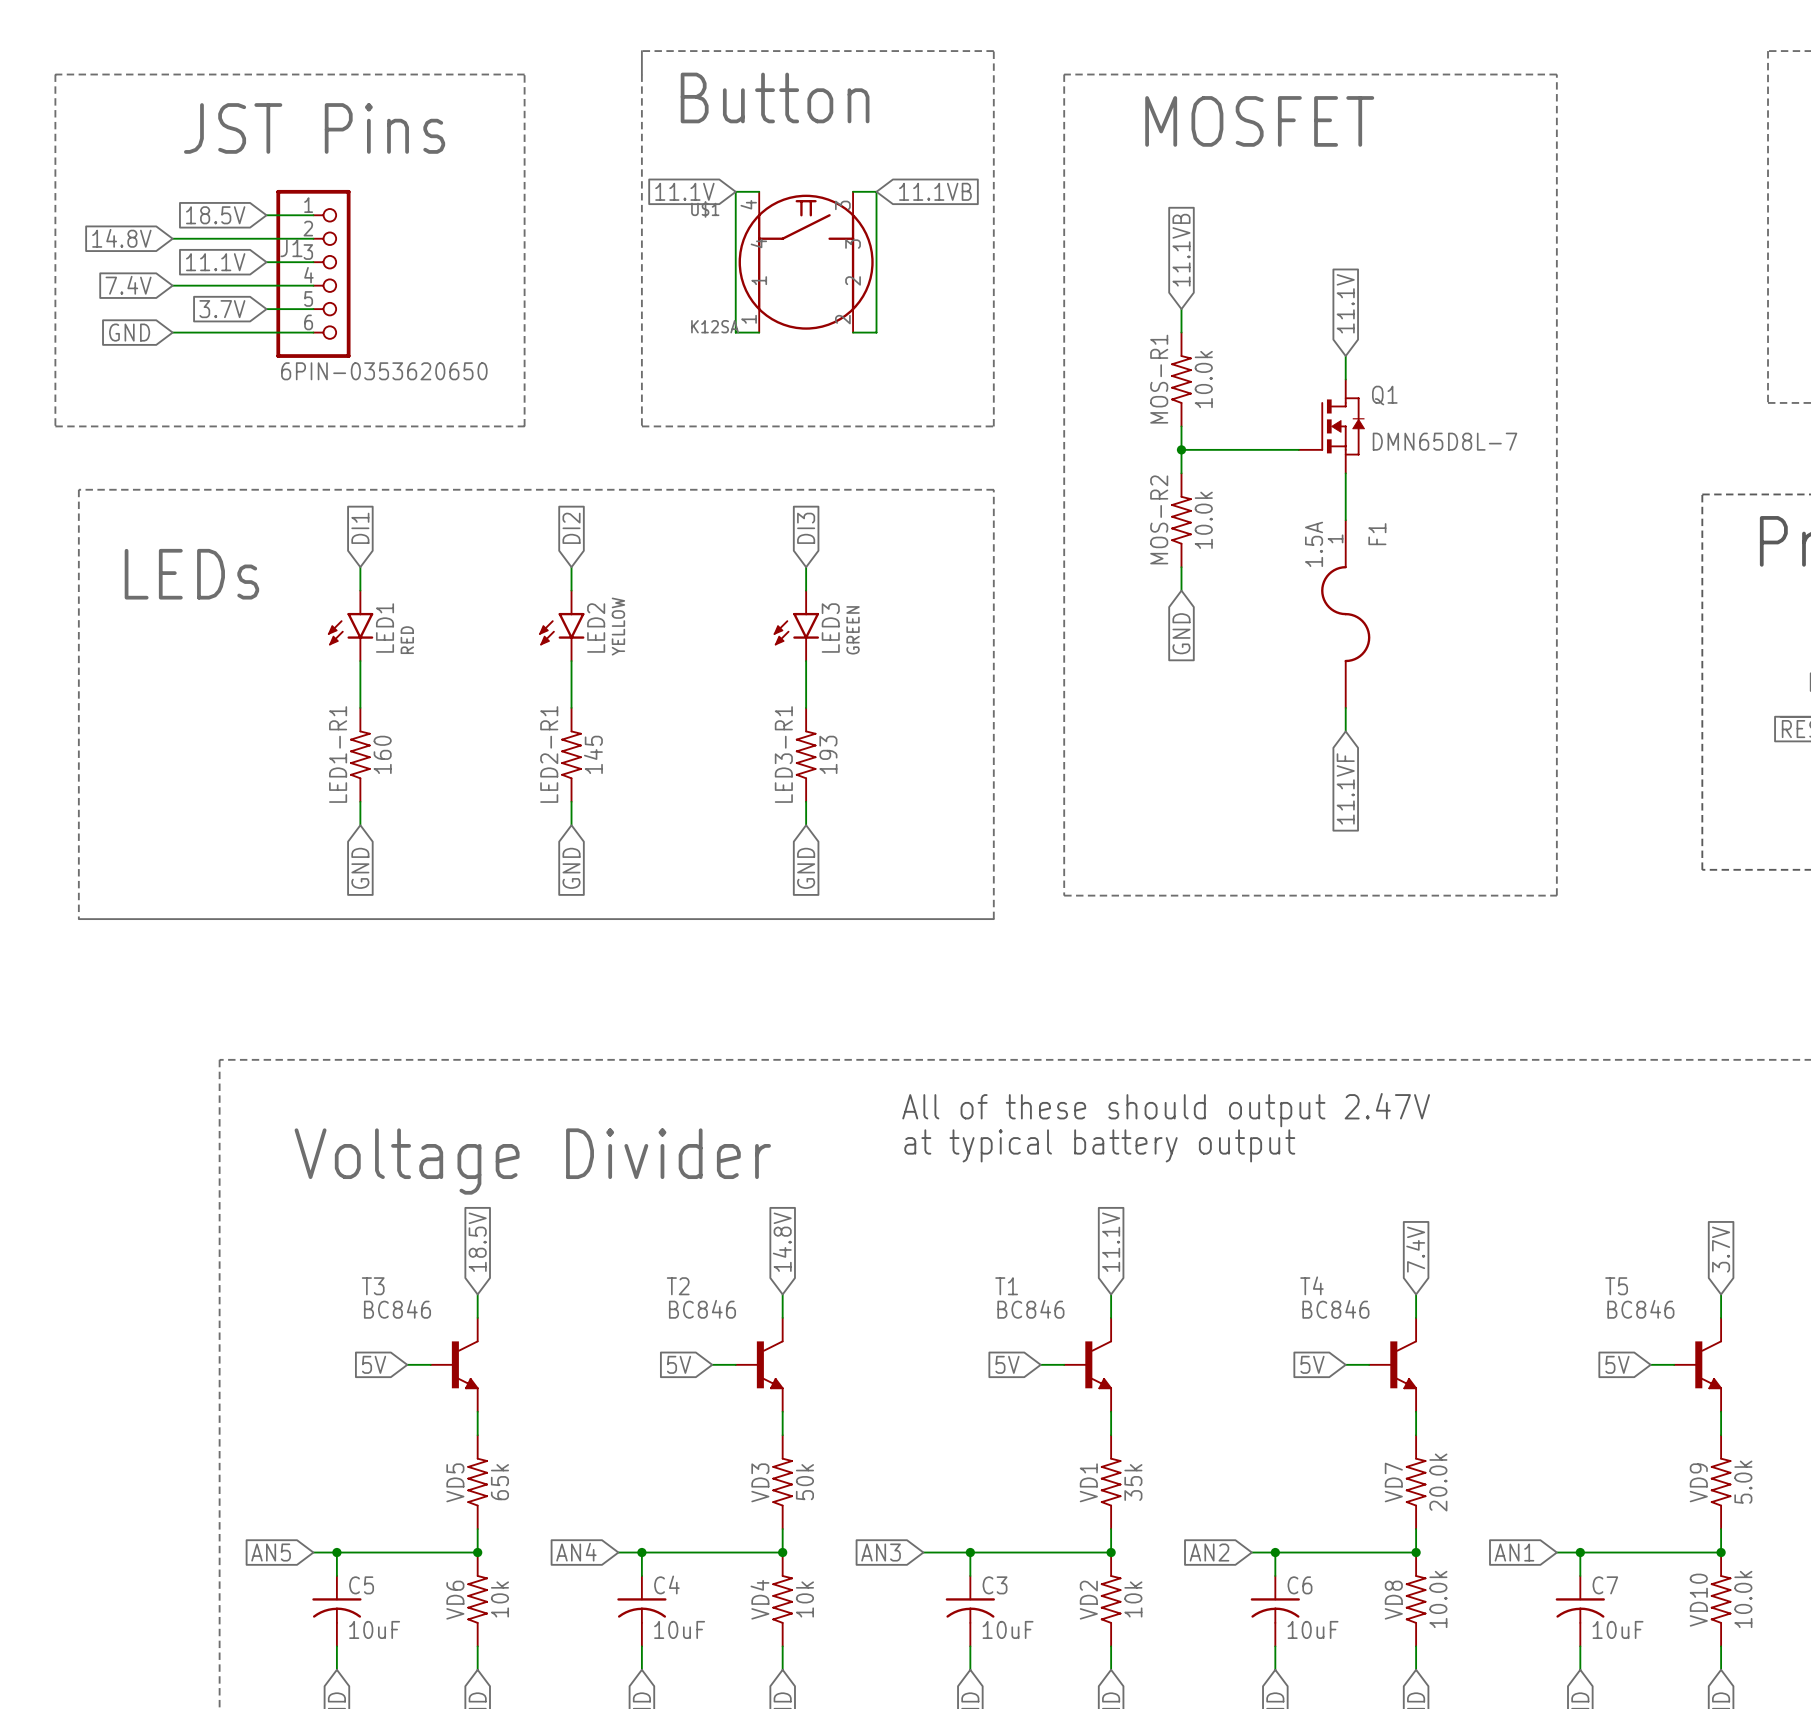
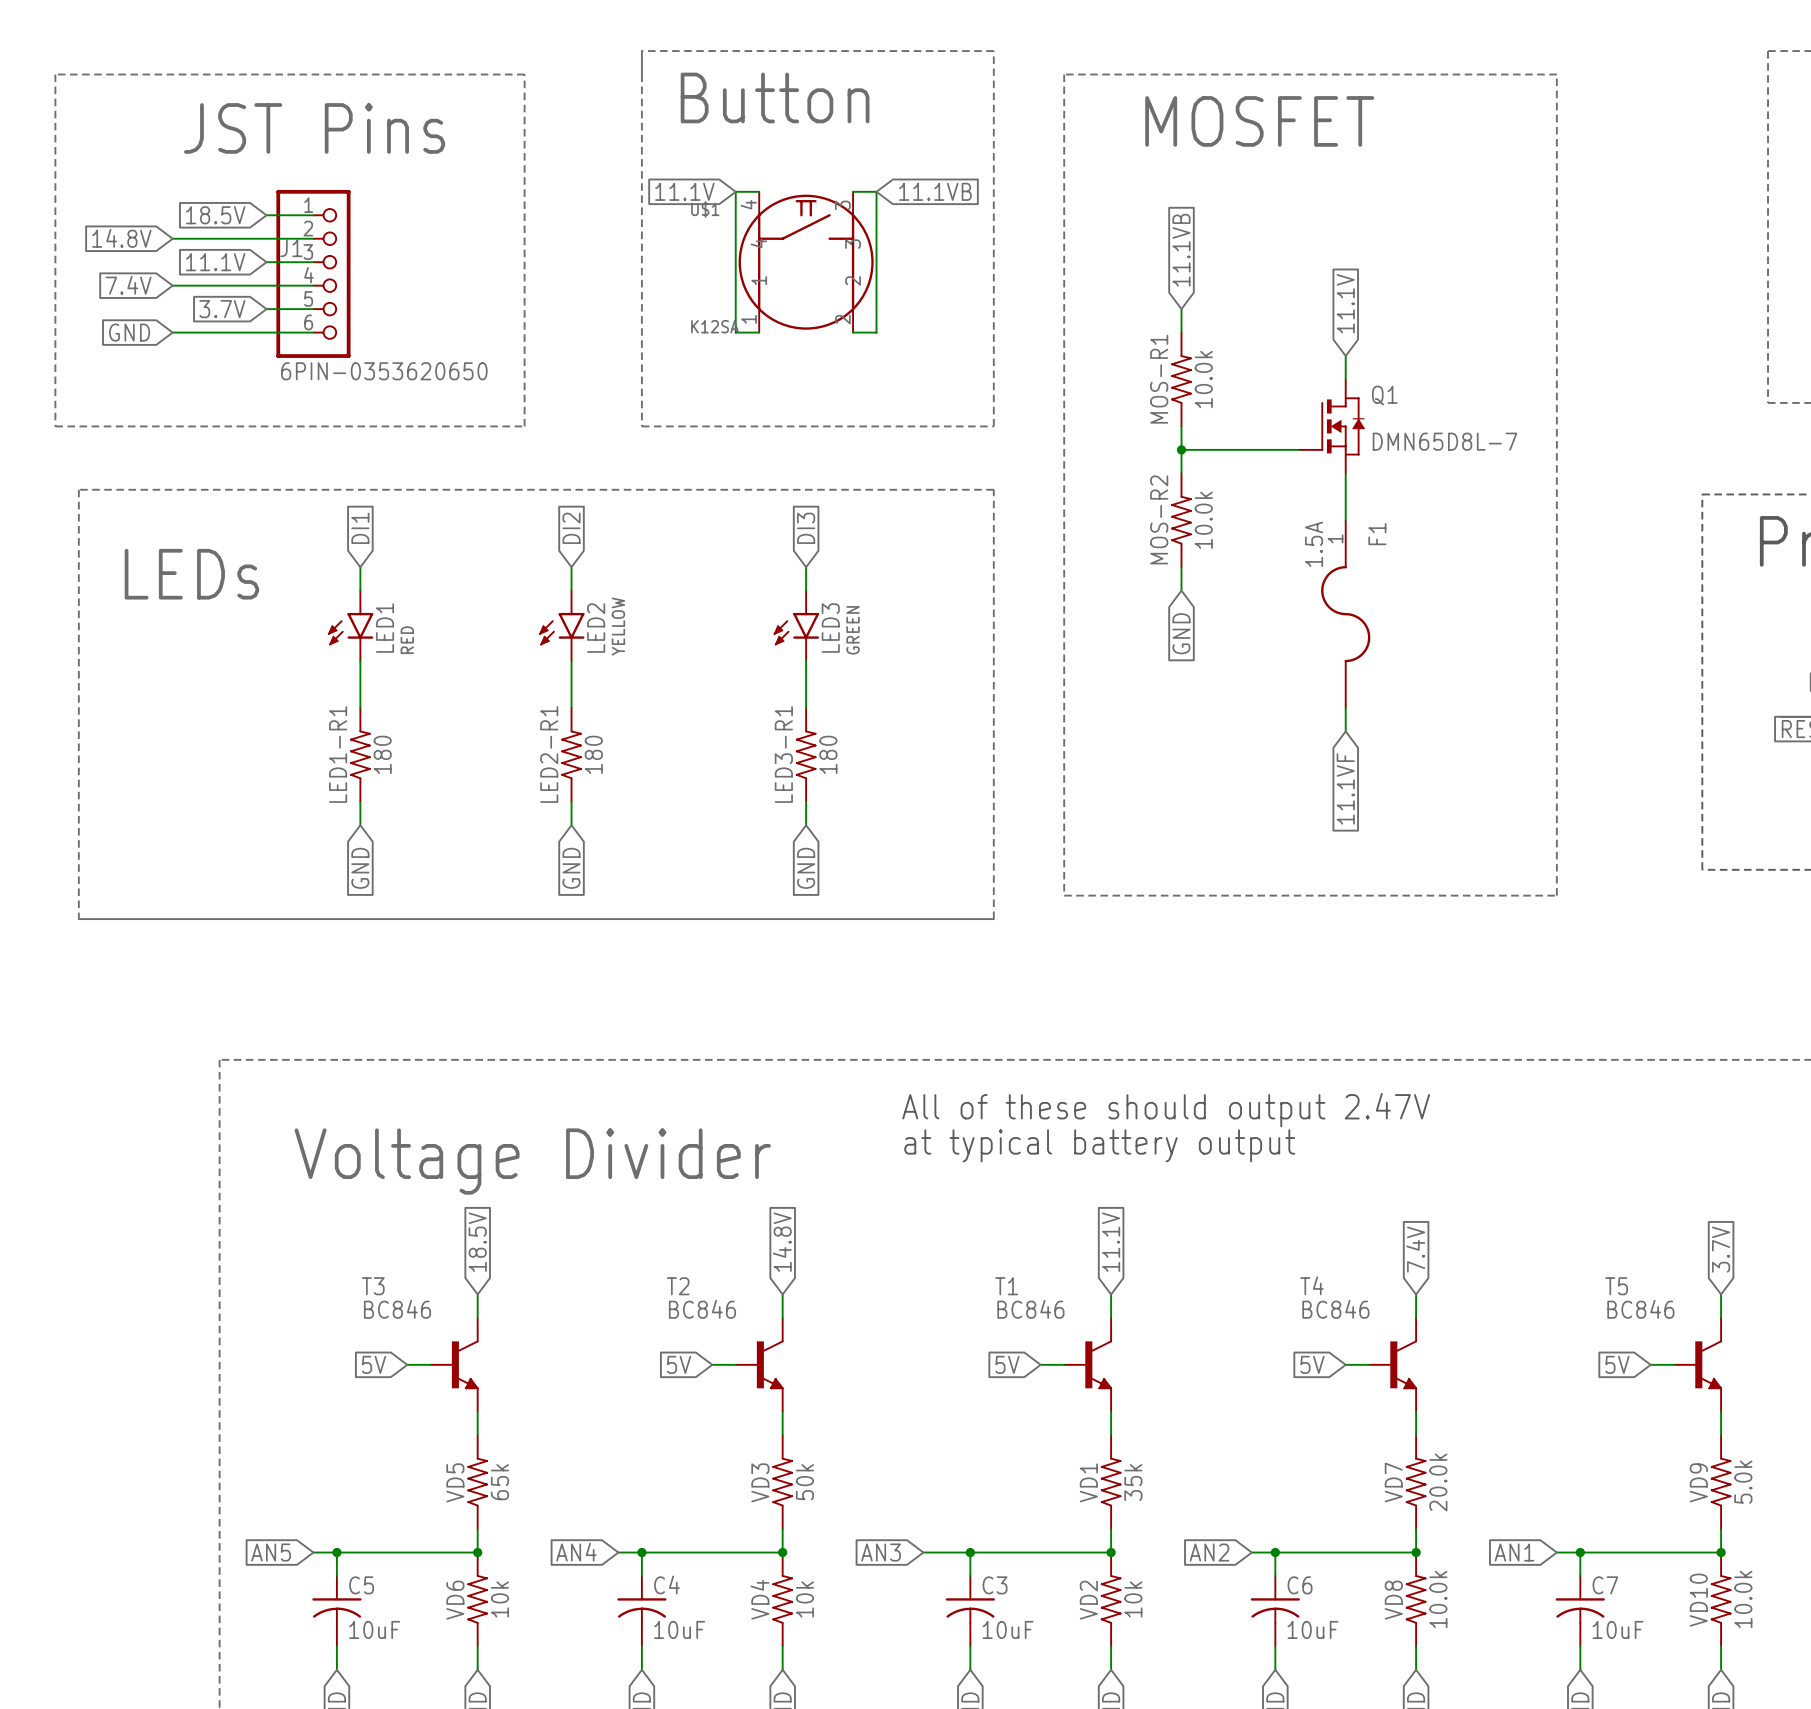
LED1-R1 value: 160 (382, 754) -> 180 (382, 754)
LED2-R1 value: 145 (593, 754) -> 180 (593, 754)
LED3-R1 value: 193 (828, 754) -> 180 (828, 754)

